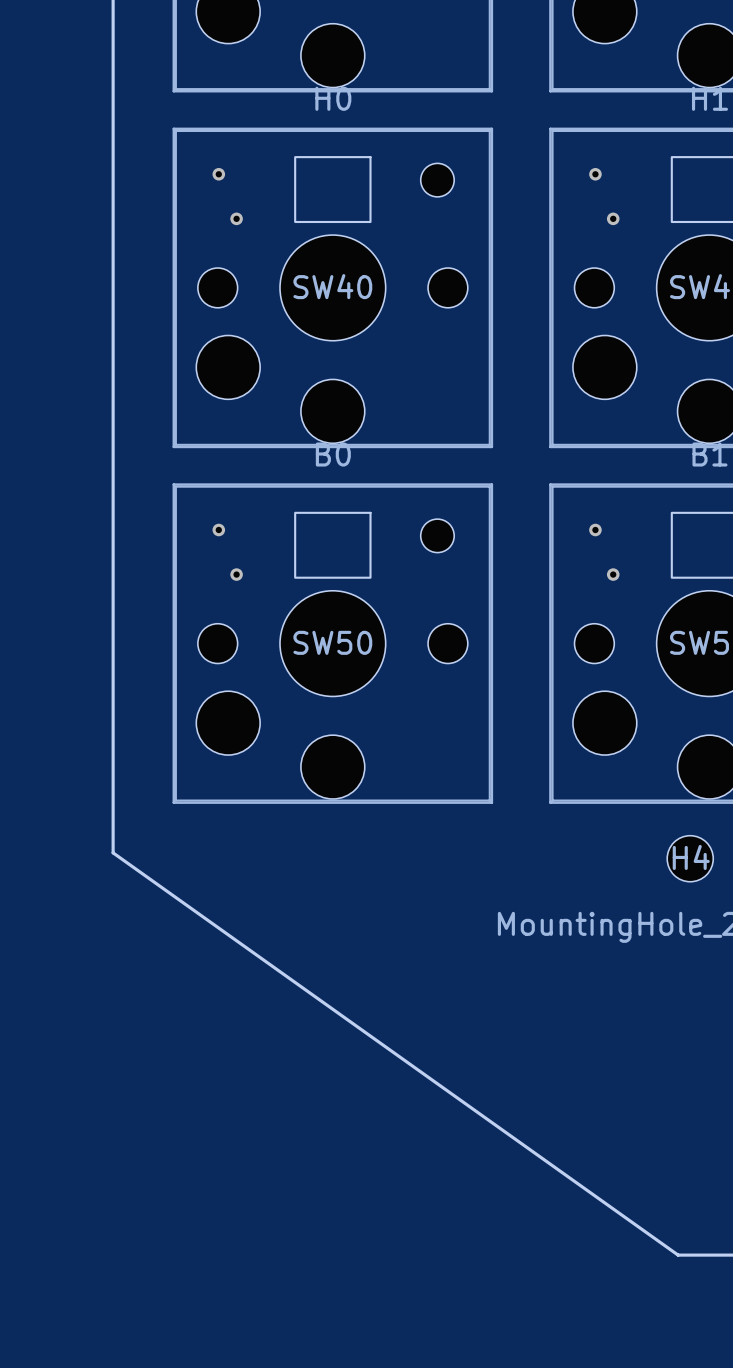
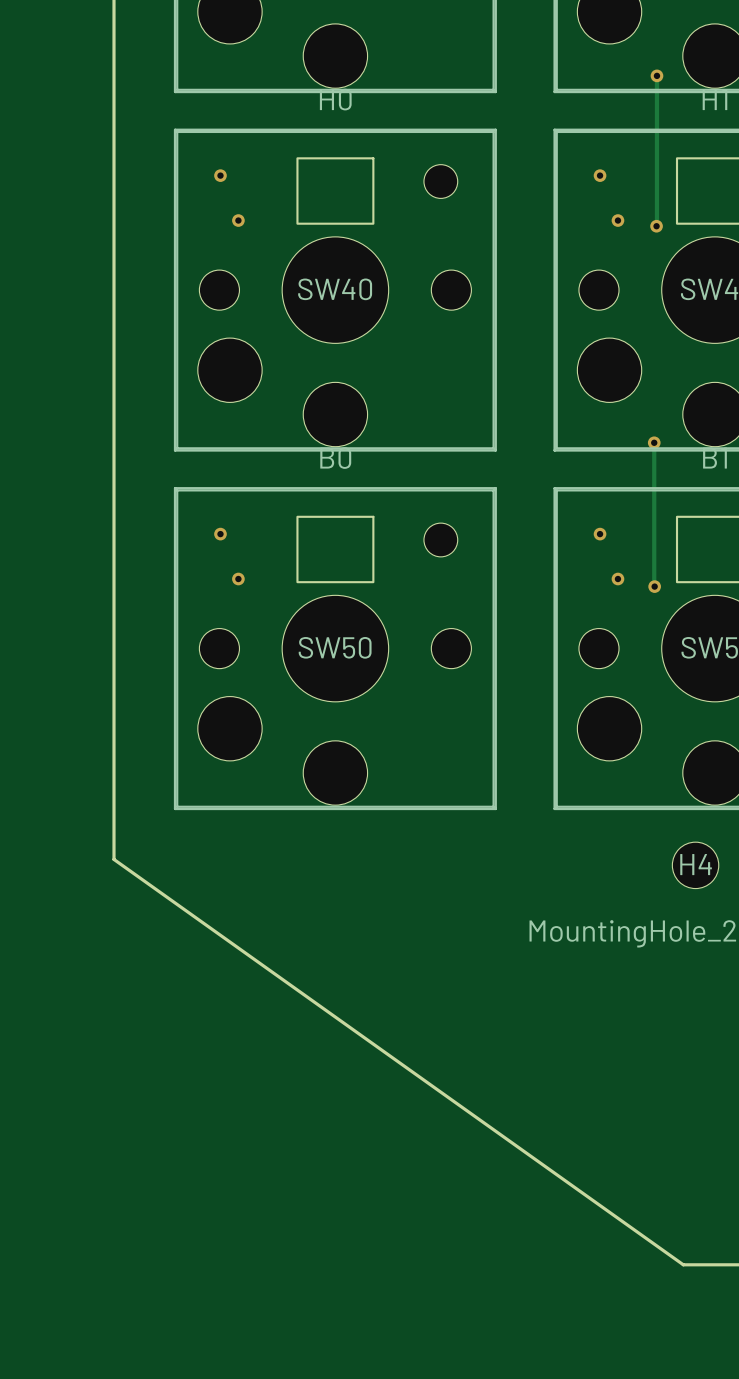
track: none -> (656, 75) (656, 226)
via: none -> (656, 75)
via: none -> (656, 226)
track: none -> (654, 442) (654, 586)
via: none -> (654, 442)
via: none -> (654, 586)

